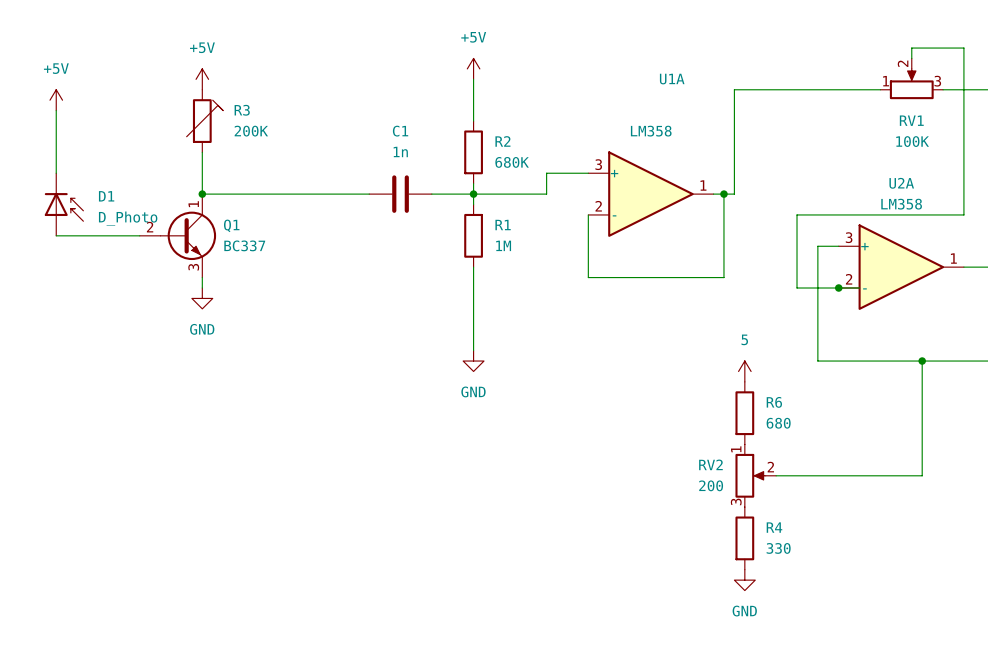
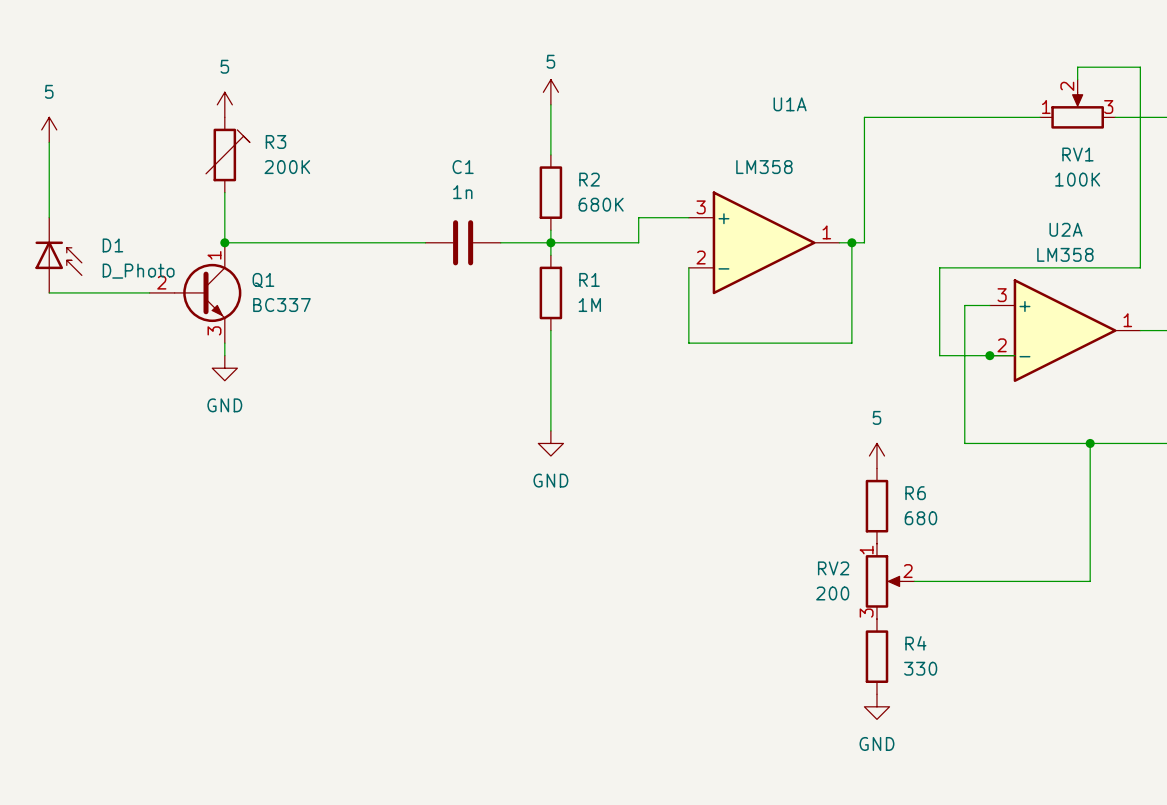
power symbol: +5V (473, 68) -> 5 (550, 92)
power symbol: +5V (202, 79) -> 5 (224, 104)
power symbol: +5V (56, 100) -> 5 (49, 129)

